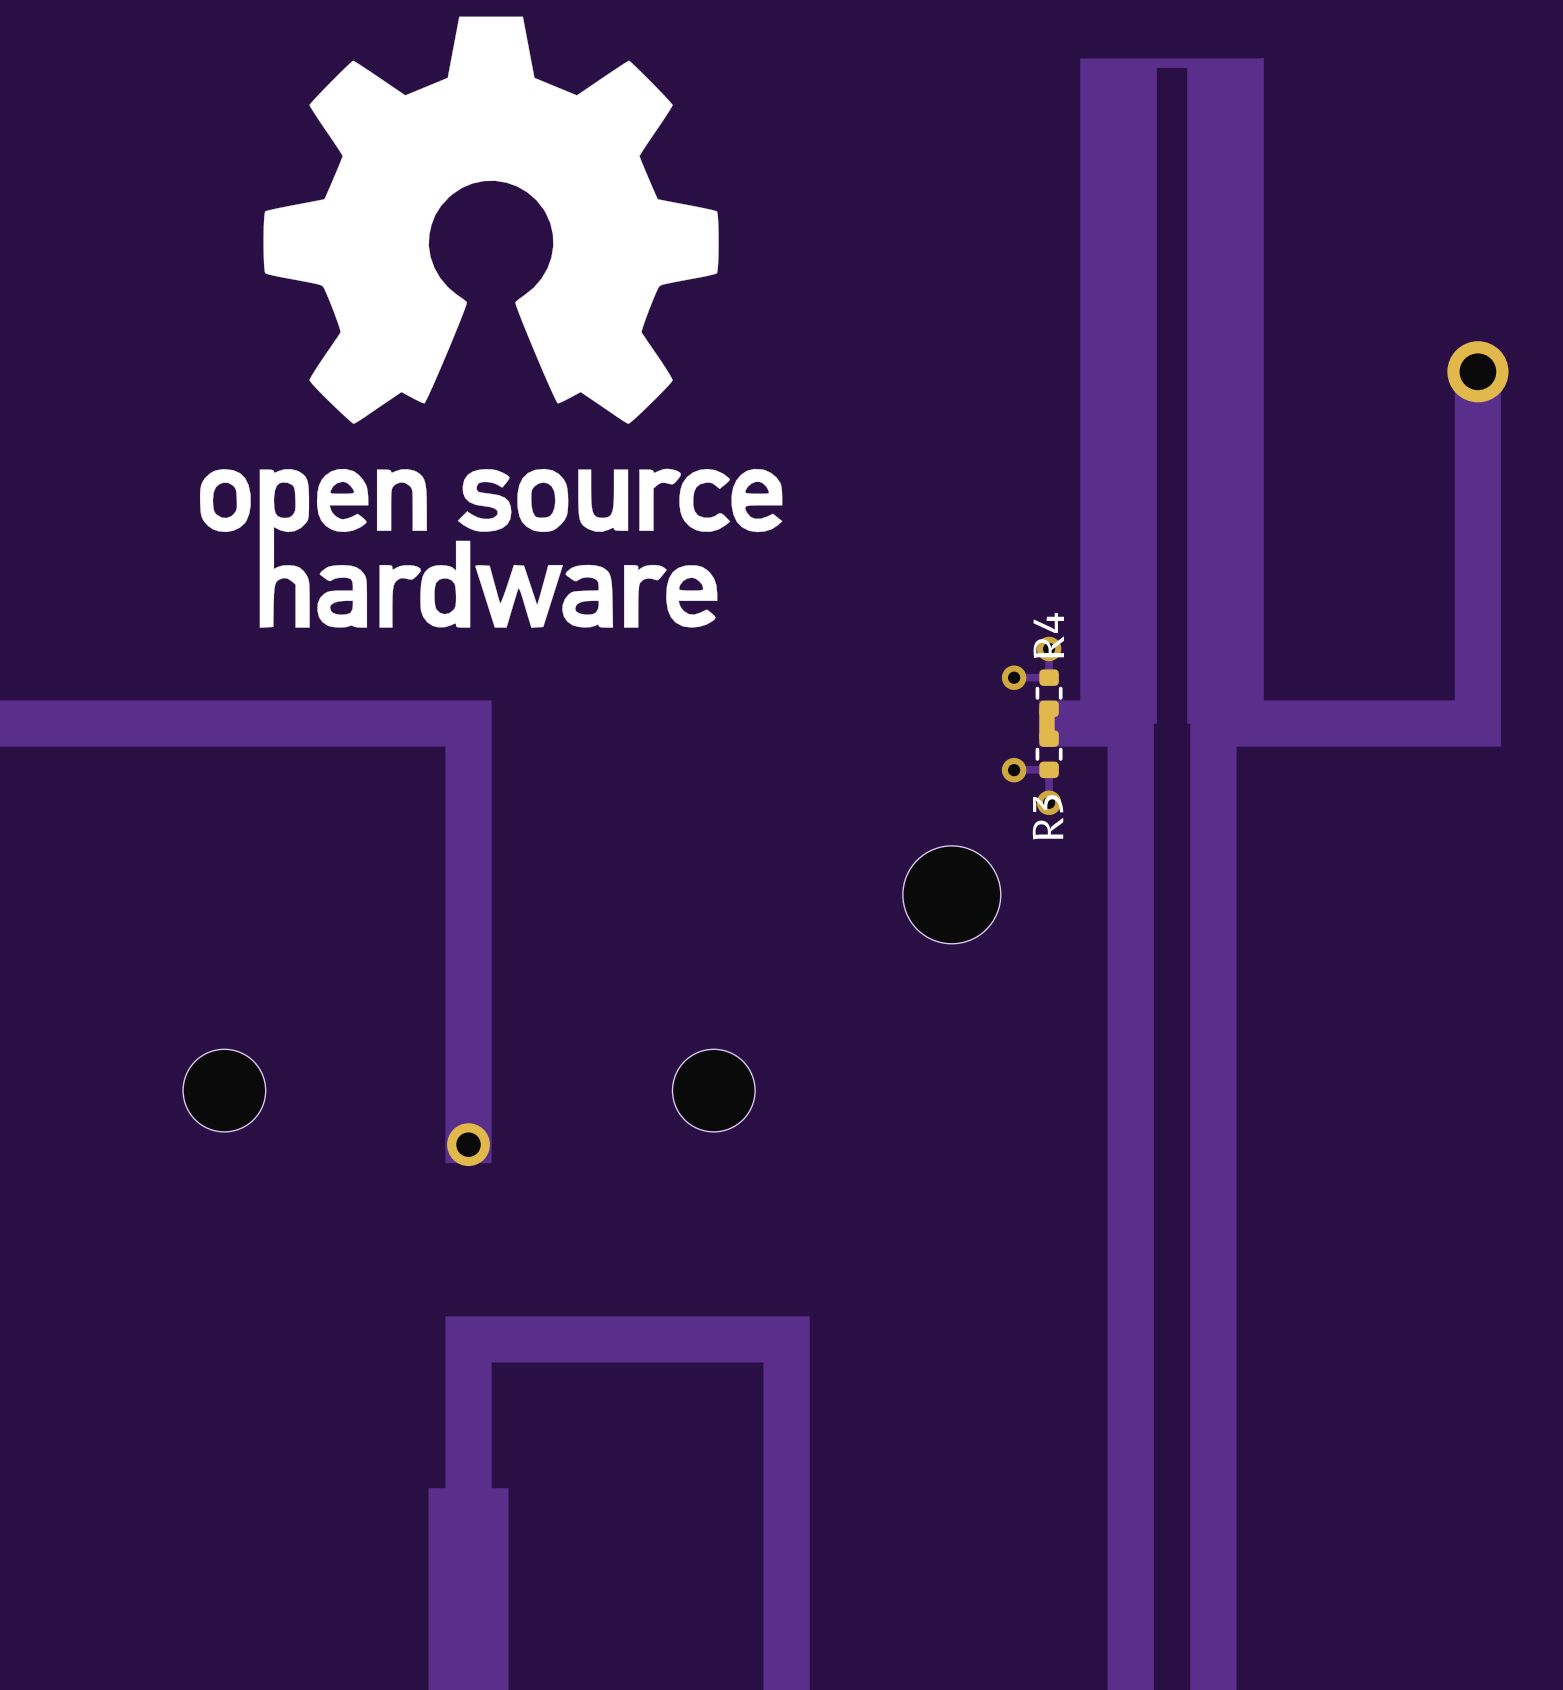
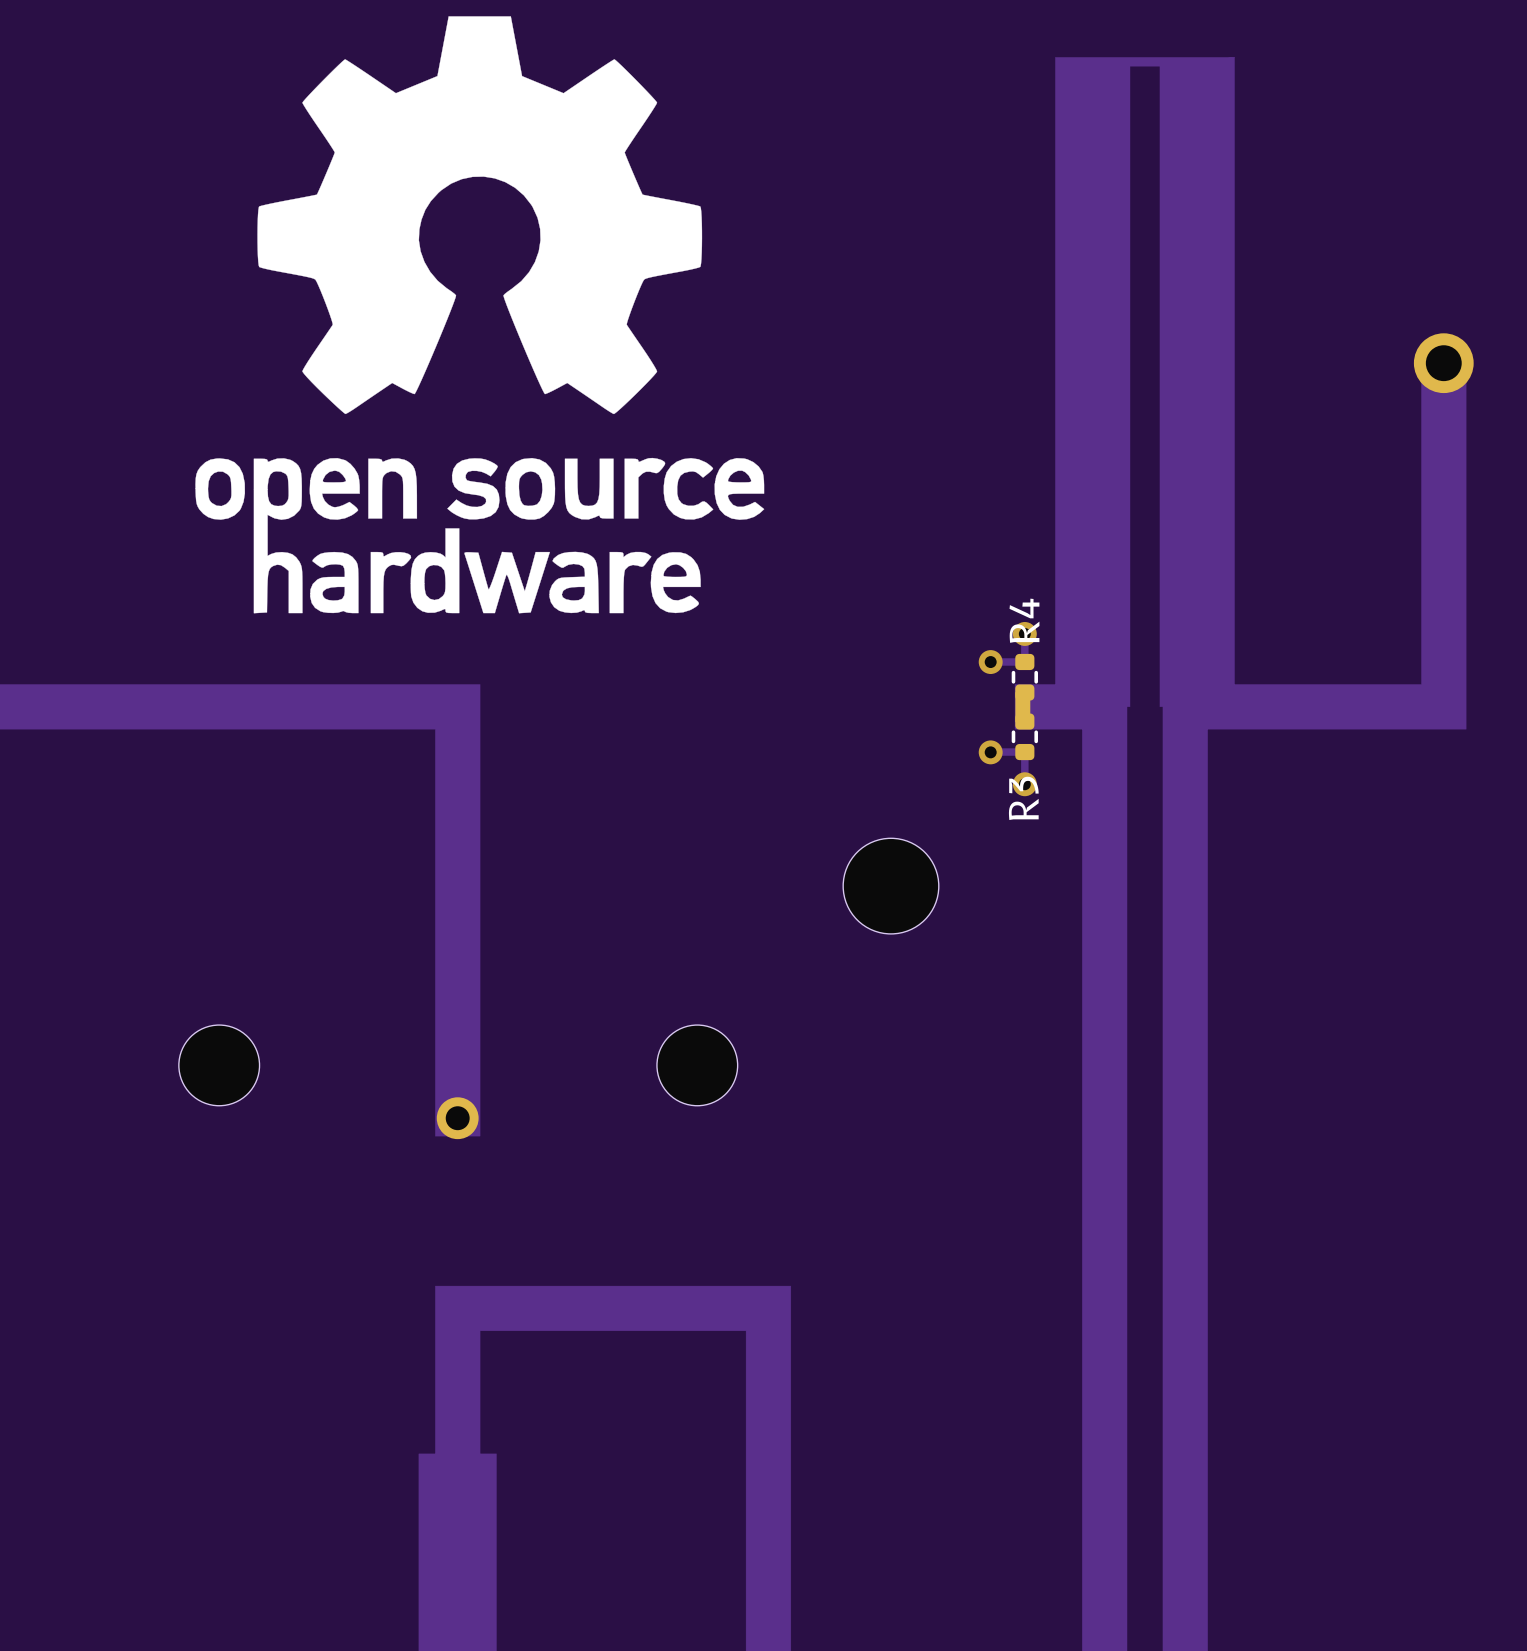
part position: (951, 894) -> (890, 886)

